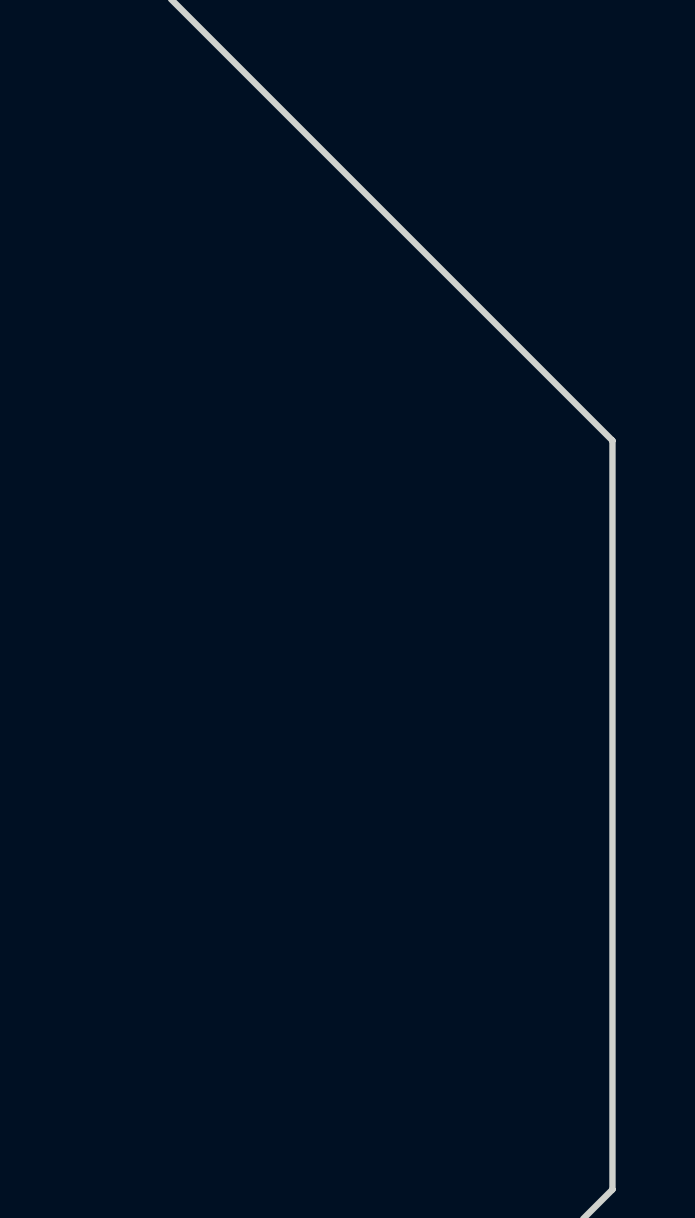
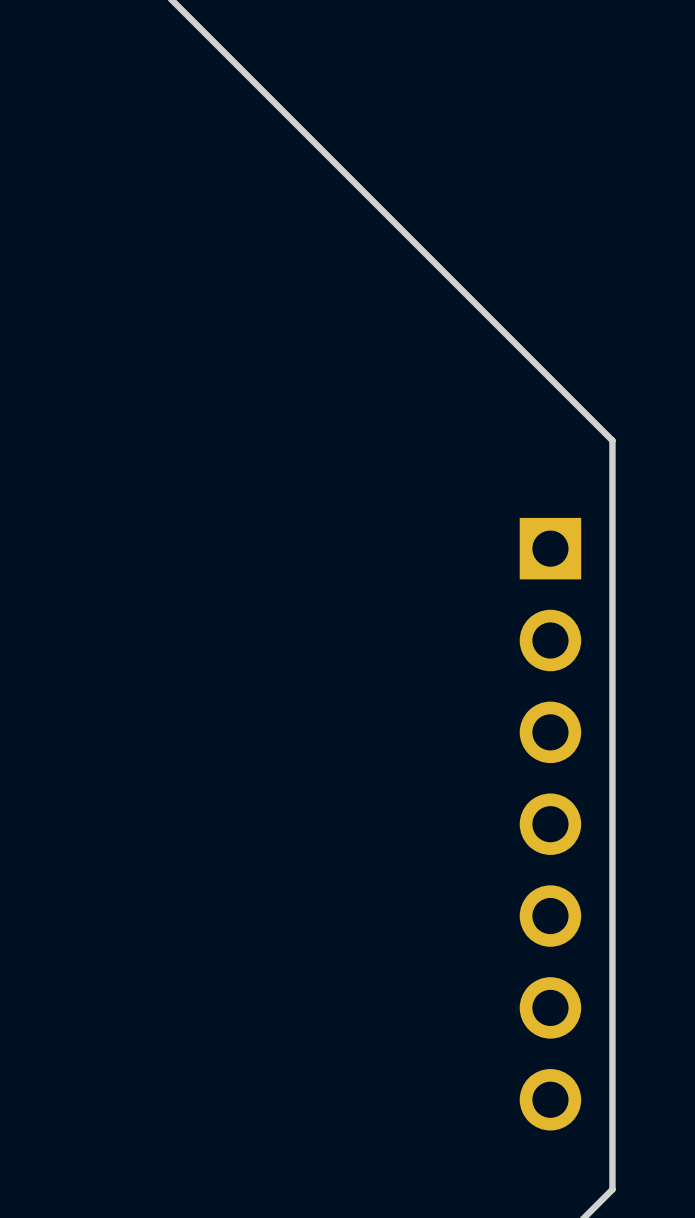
part: none -> (550, 824)

